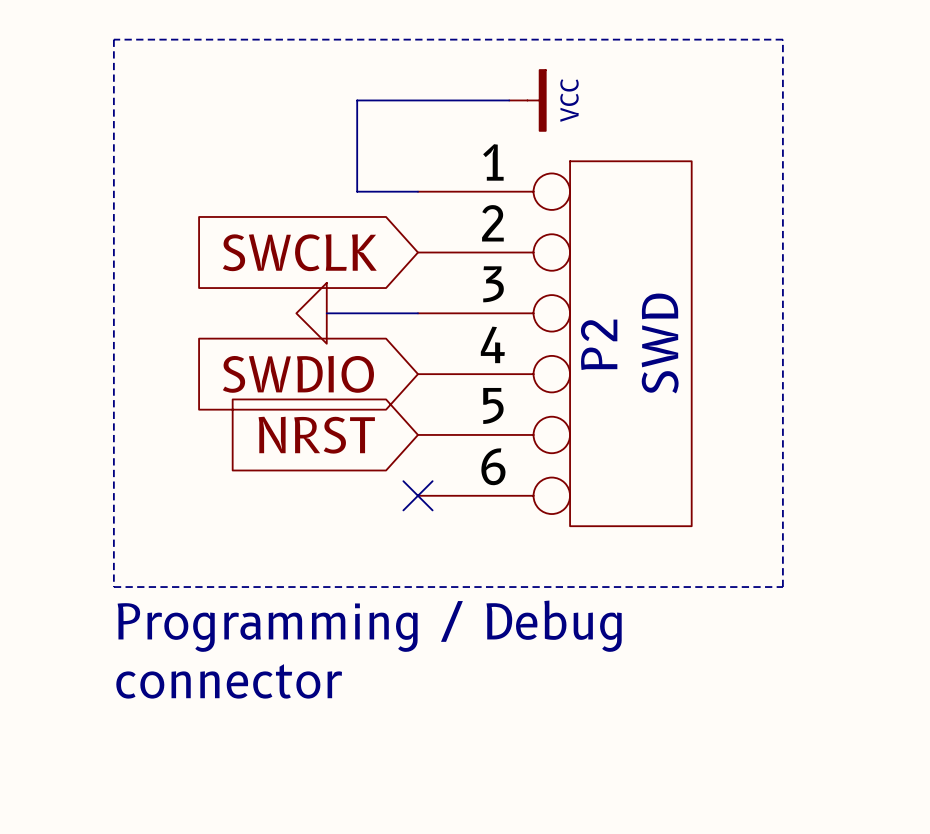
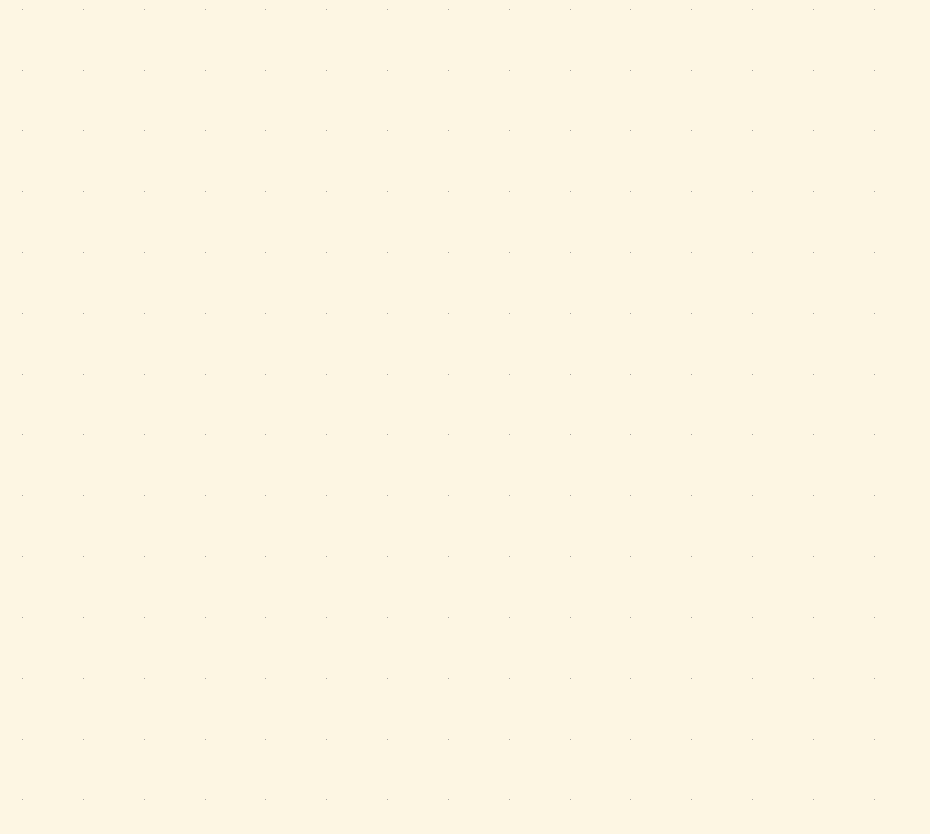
line: (113, 39) (113, 587) (782, 587) (782, 39) (113, 39) -> none
wire: (509, 100) (357, 100) (357, 191) (418, 191) -> none
power symbol: VCC (527, 100) -> none
global label: SWCLK (299, 252) -> none
power symbol: (311, 313) -> none
wire: (326, 313) (418, 313) -> none
P2: SWD (554, 343) -> none
global label: SWDIO (298, 374) -> none
global label: NRST (316, 435) -> none
no-connect mark: (418, 495) -> none
text: Programming / Debug (369, 626) -> none
text: connector (229, 681) -> none

